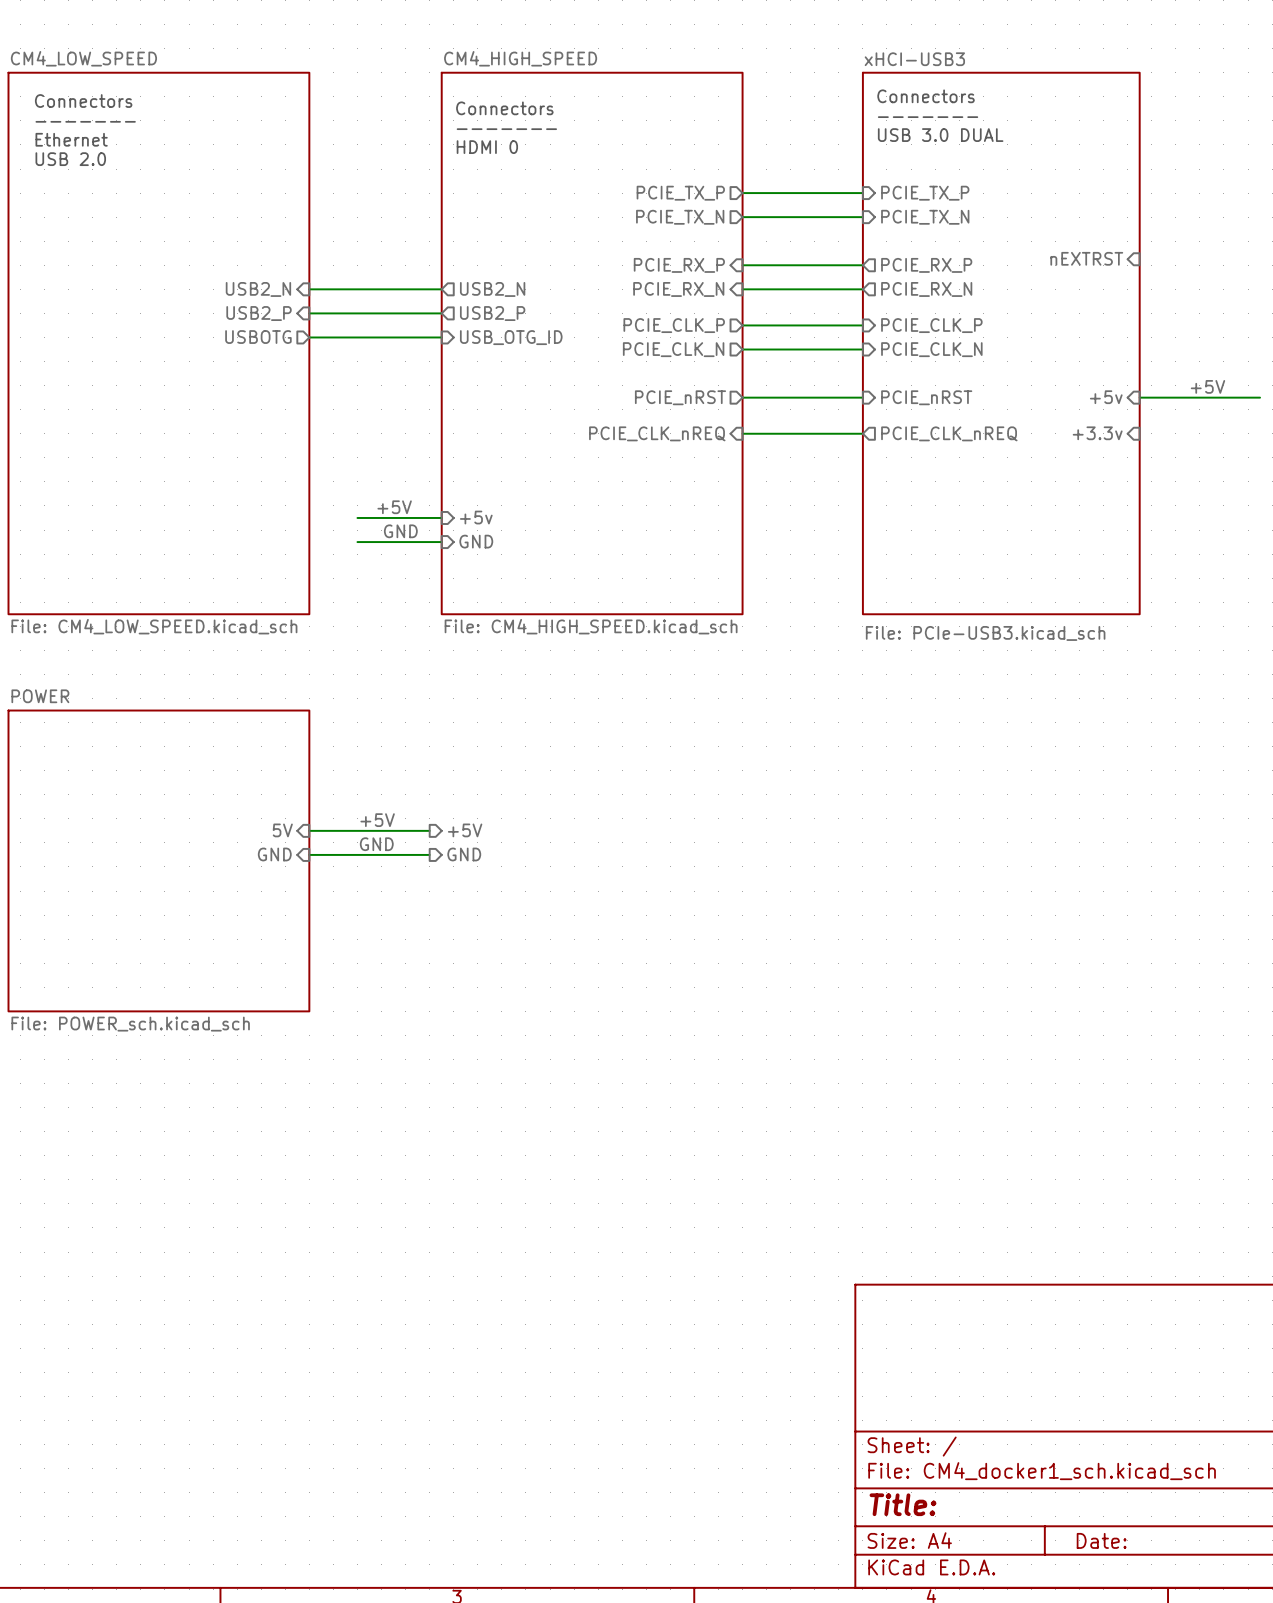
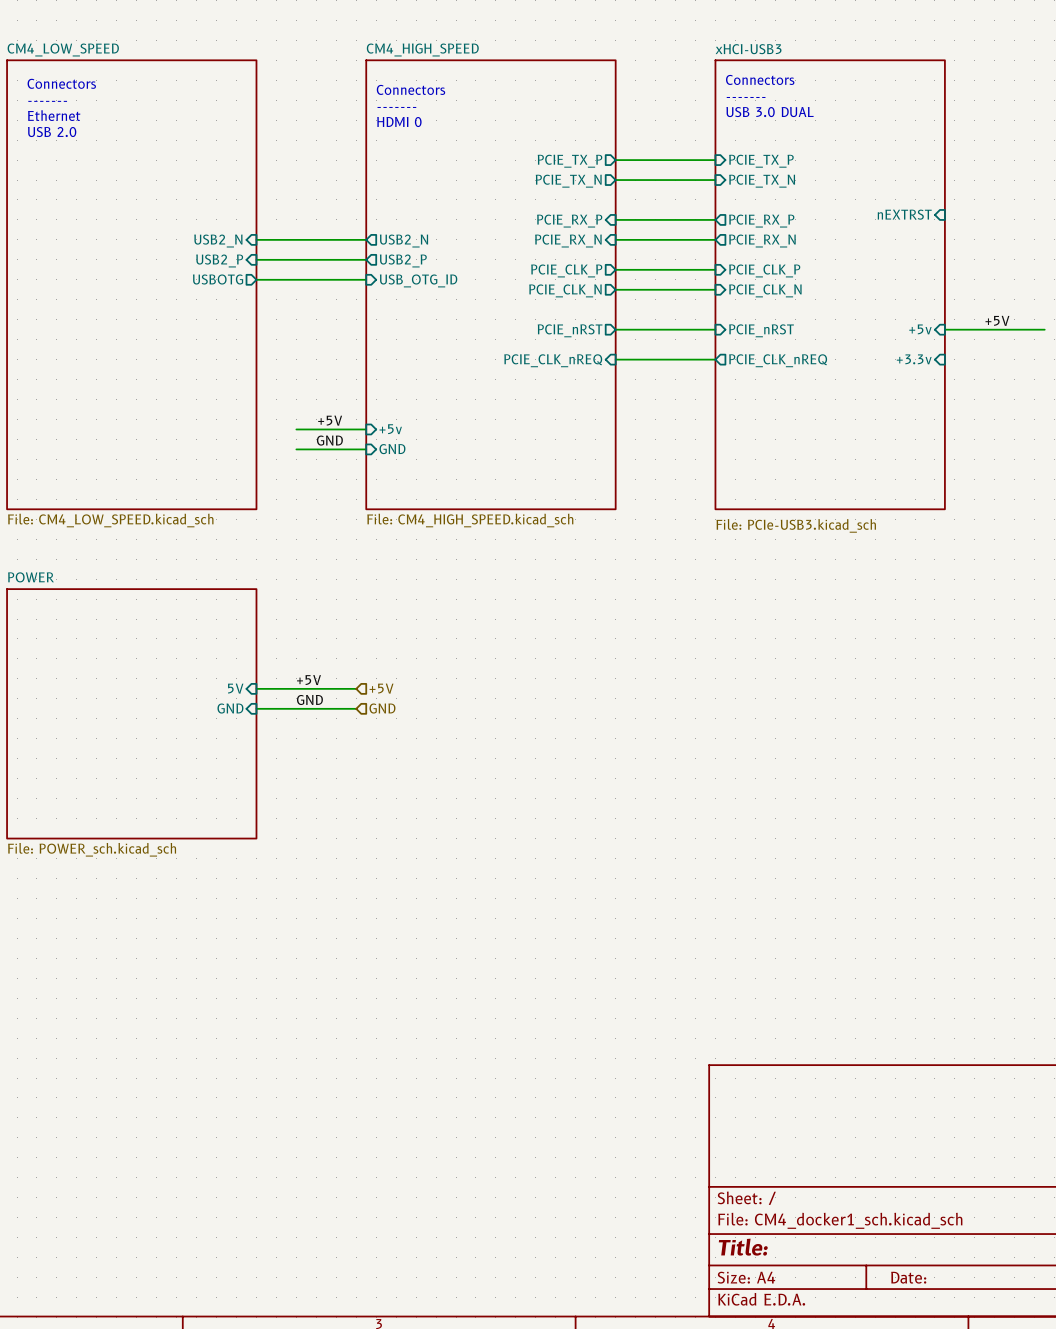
hierarchical label shape: output (465, 830) -> input (381, 688)
hierarchical label shape: output (464, 854) -> input (382, 708)

